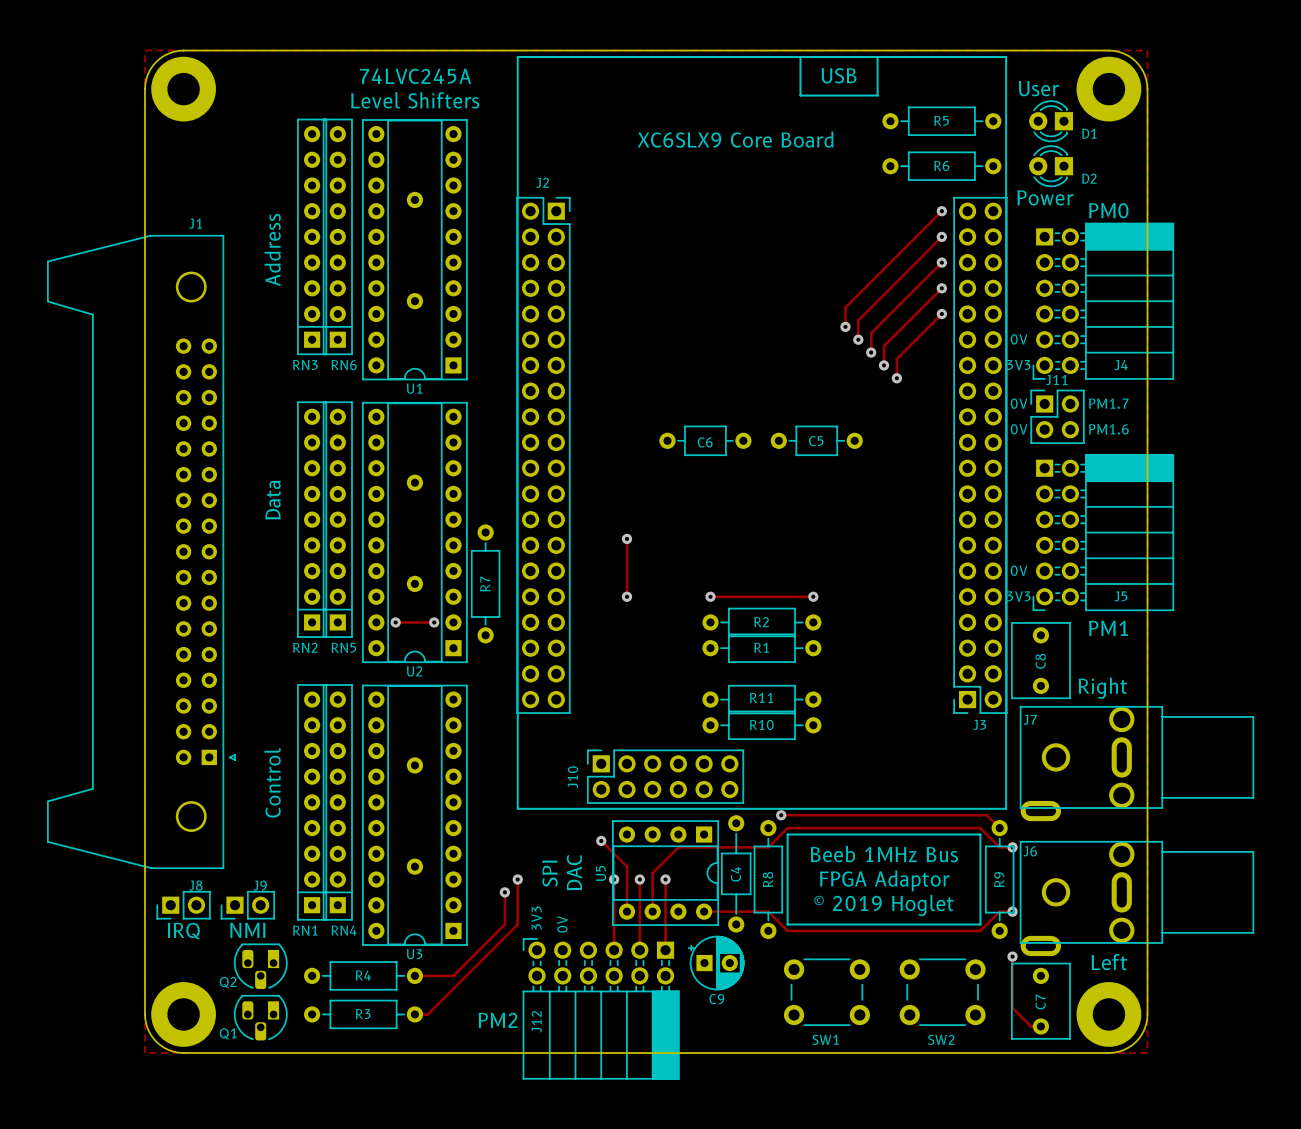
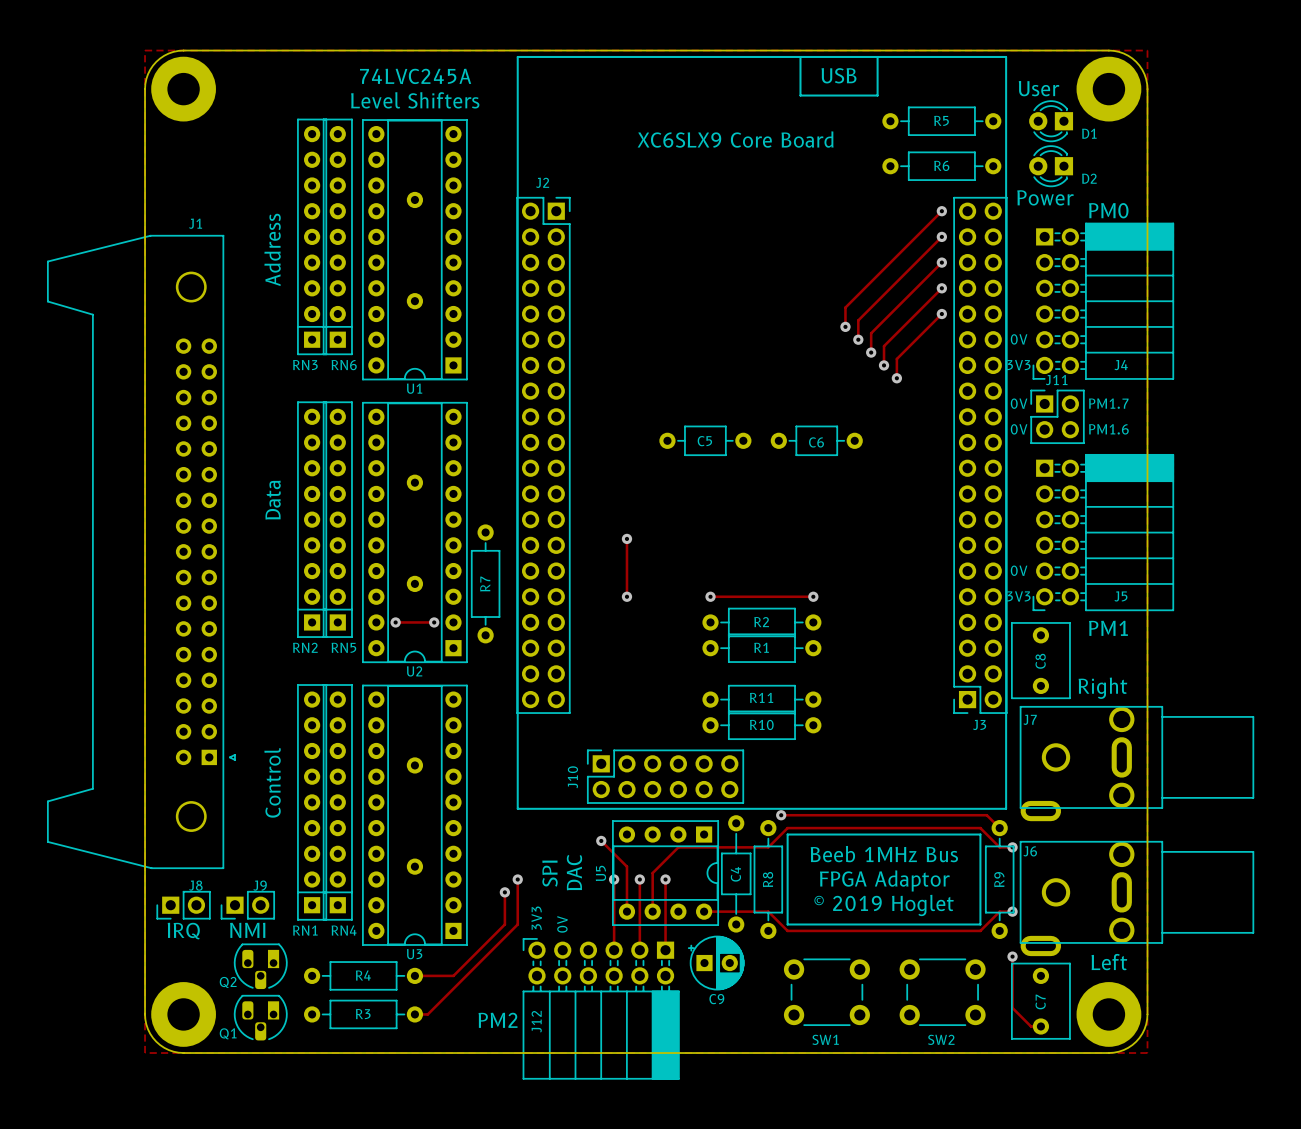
C5 name: C5 (816, 441) -> C6 (816, 442)
C6 name: C6 (705, 442) -> C5 (704, 441)

